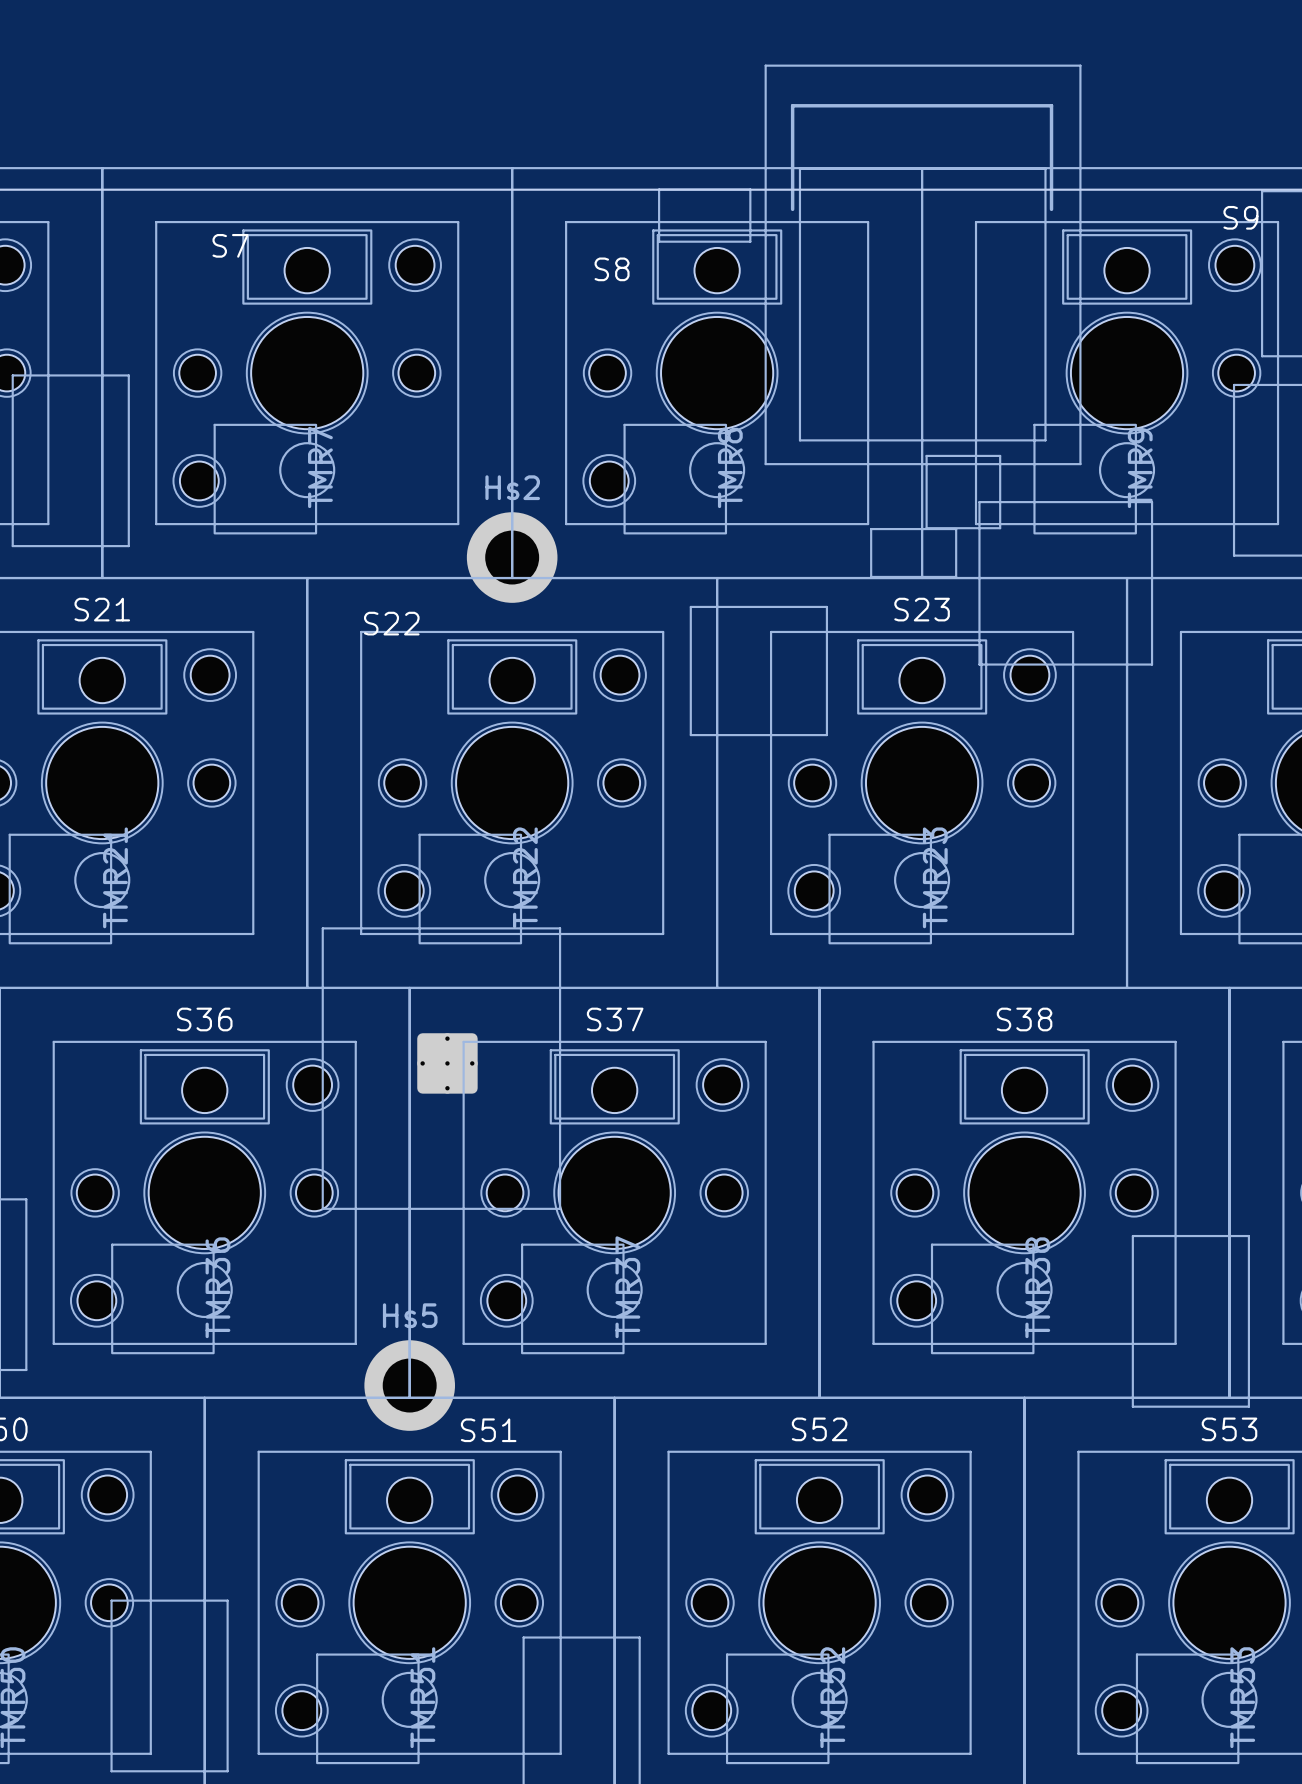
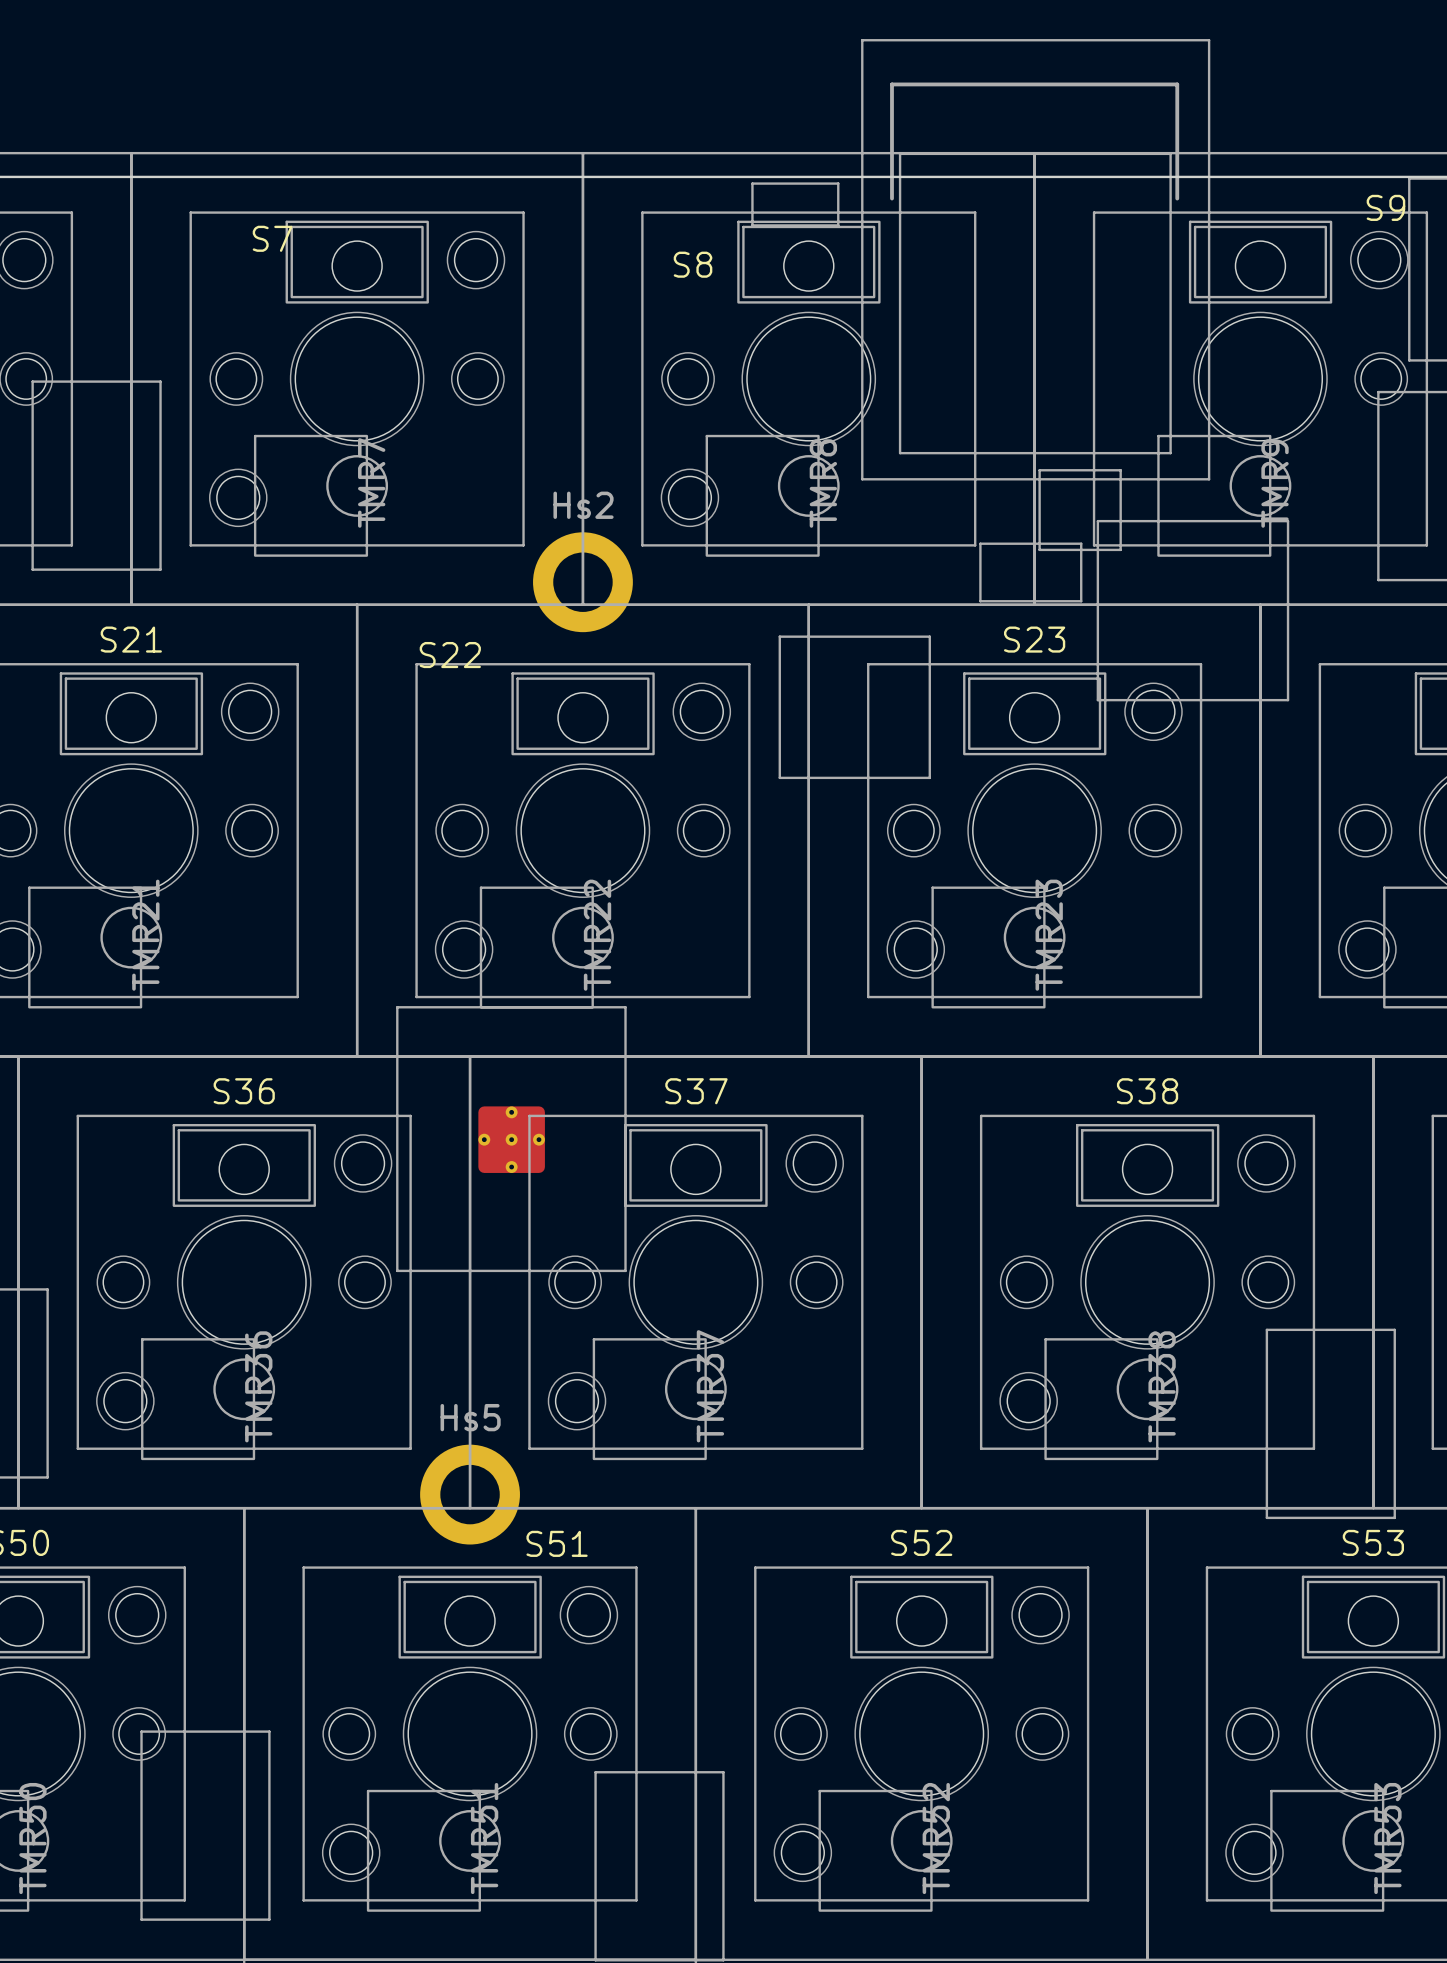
line: (659, 189) (750, 189) (750, 241) (659, 241) (659, 189) -> (980, 543) (1081, 543) (1081, 601) (980, 601) (980, 543)
line: none -> (752, 183) (838, 183) (838, 225) (752, 225) (752, 183)
line: (871, 529) (956, 529) (956, 576) (871, 576) (871, 529) -> none
line: (322, 928) (560, 928) (560, 1208) (322, 1208) (322, 928) -> (397, 1007) (397, 1270) (625, 1270) (625, 1007) (397, 1007)

